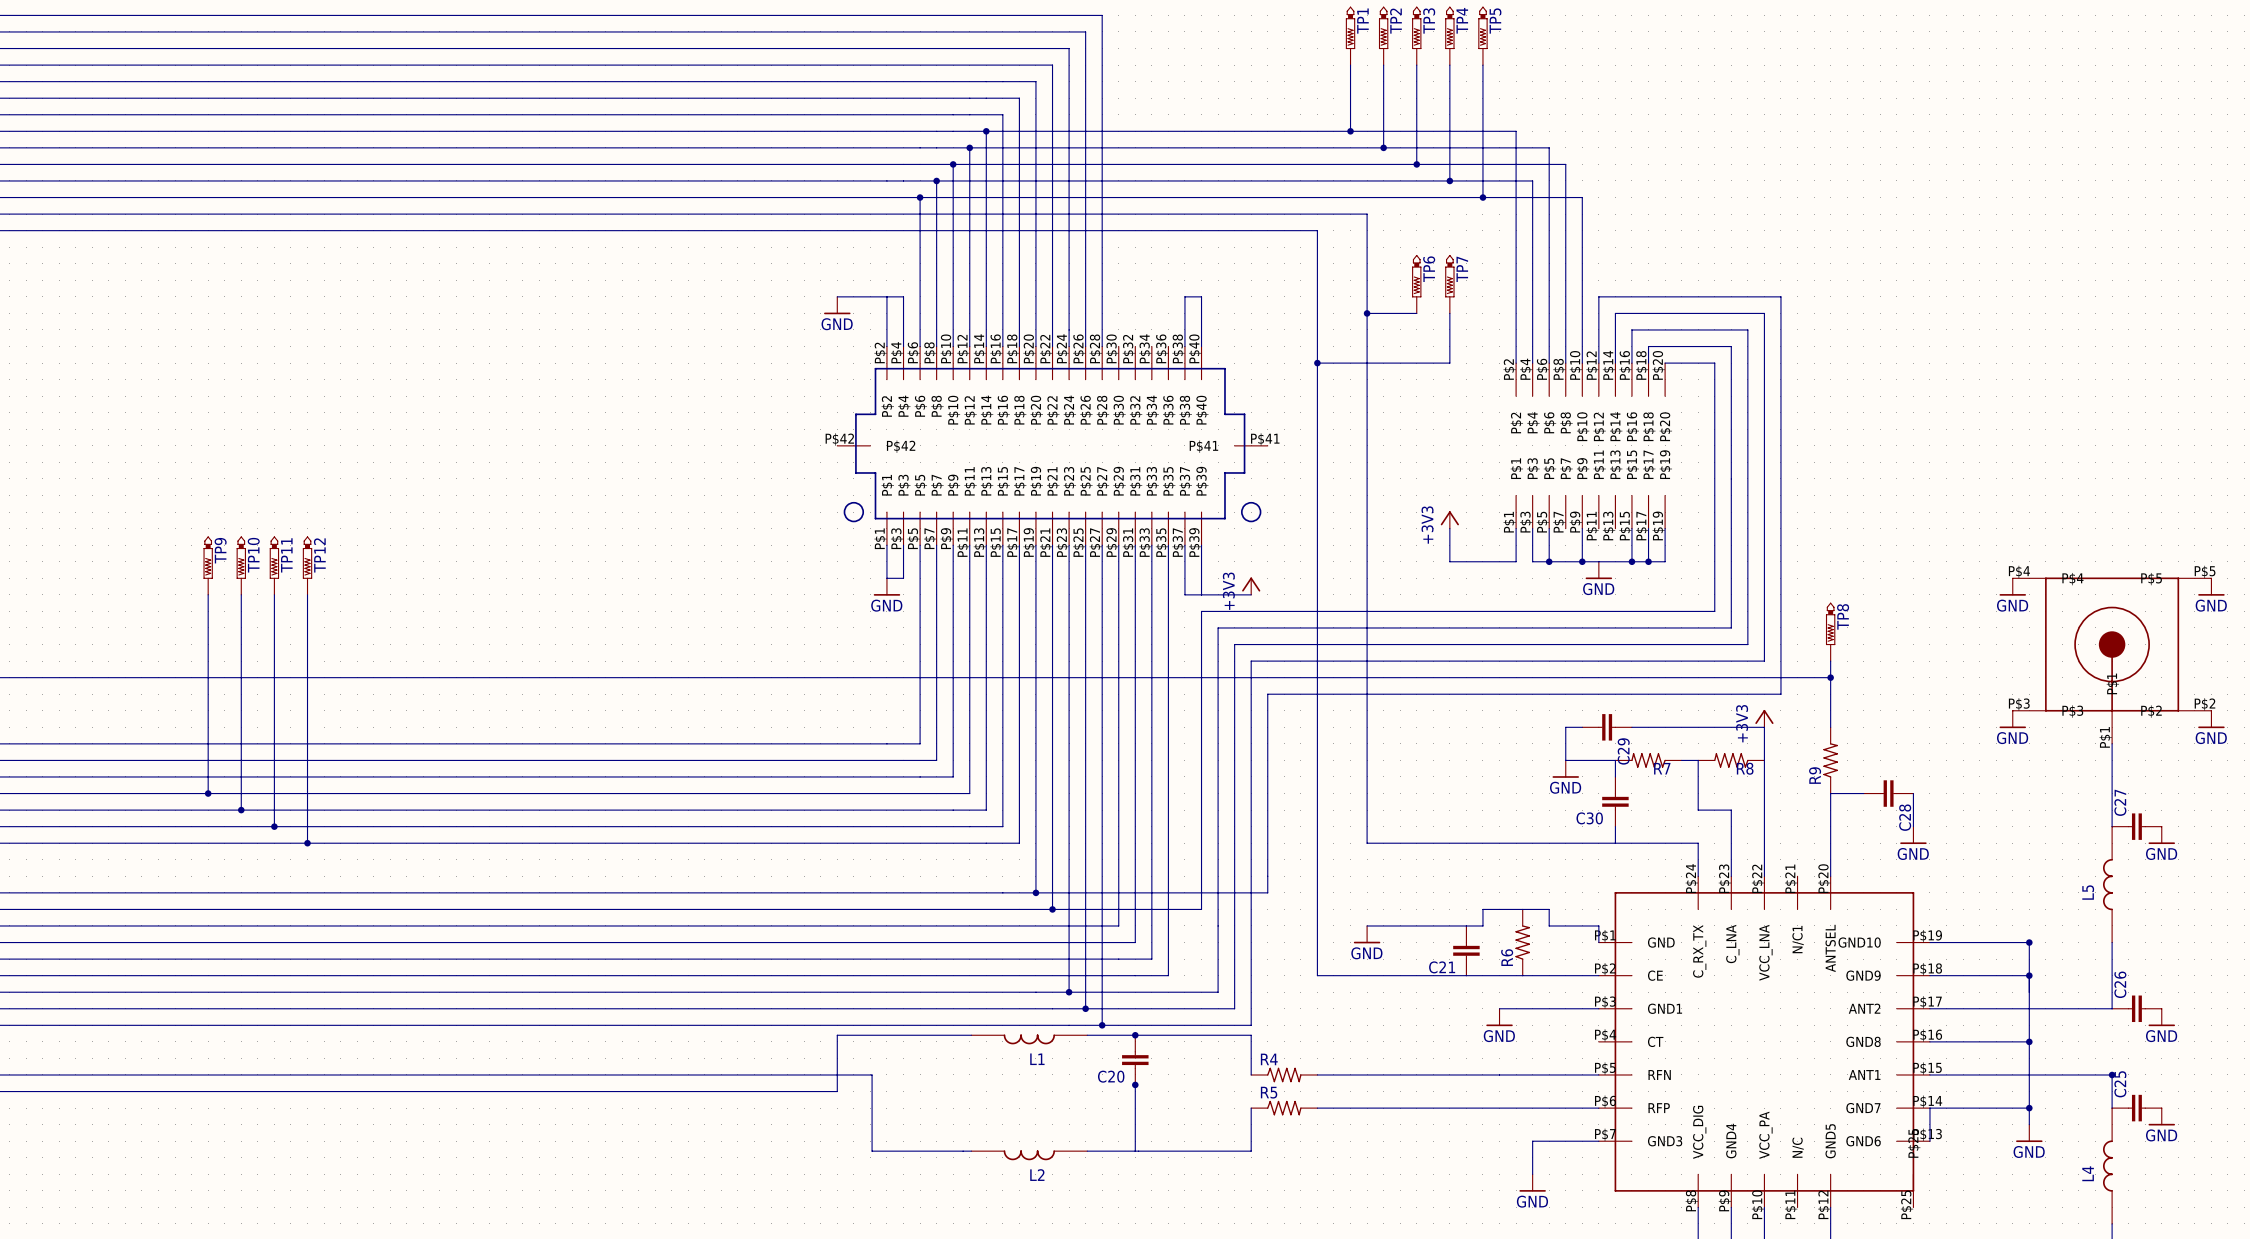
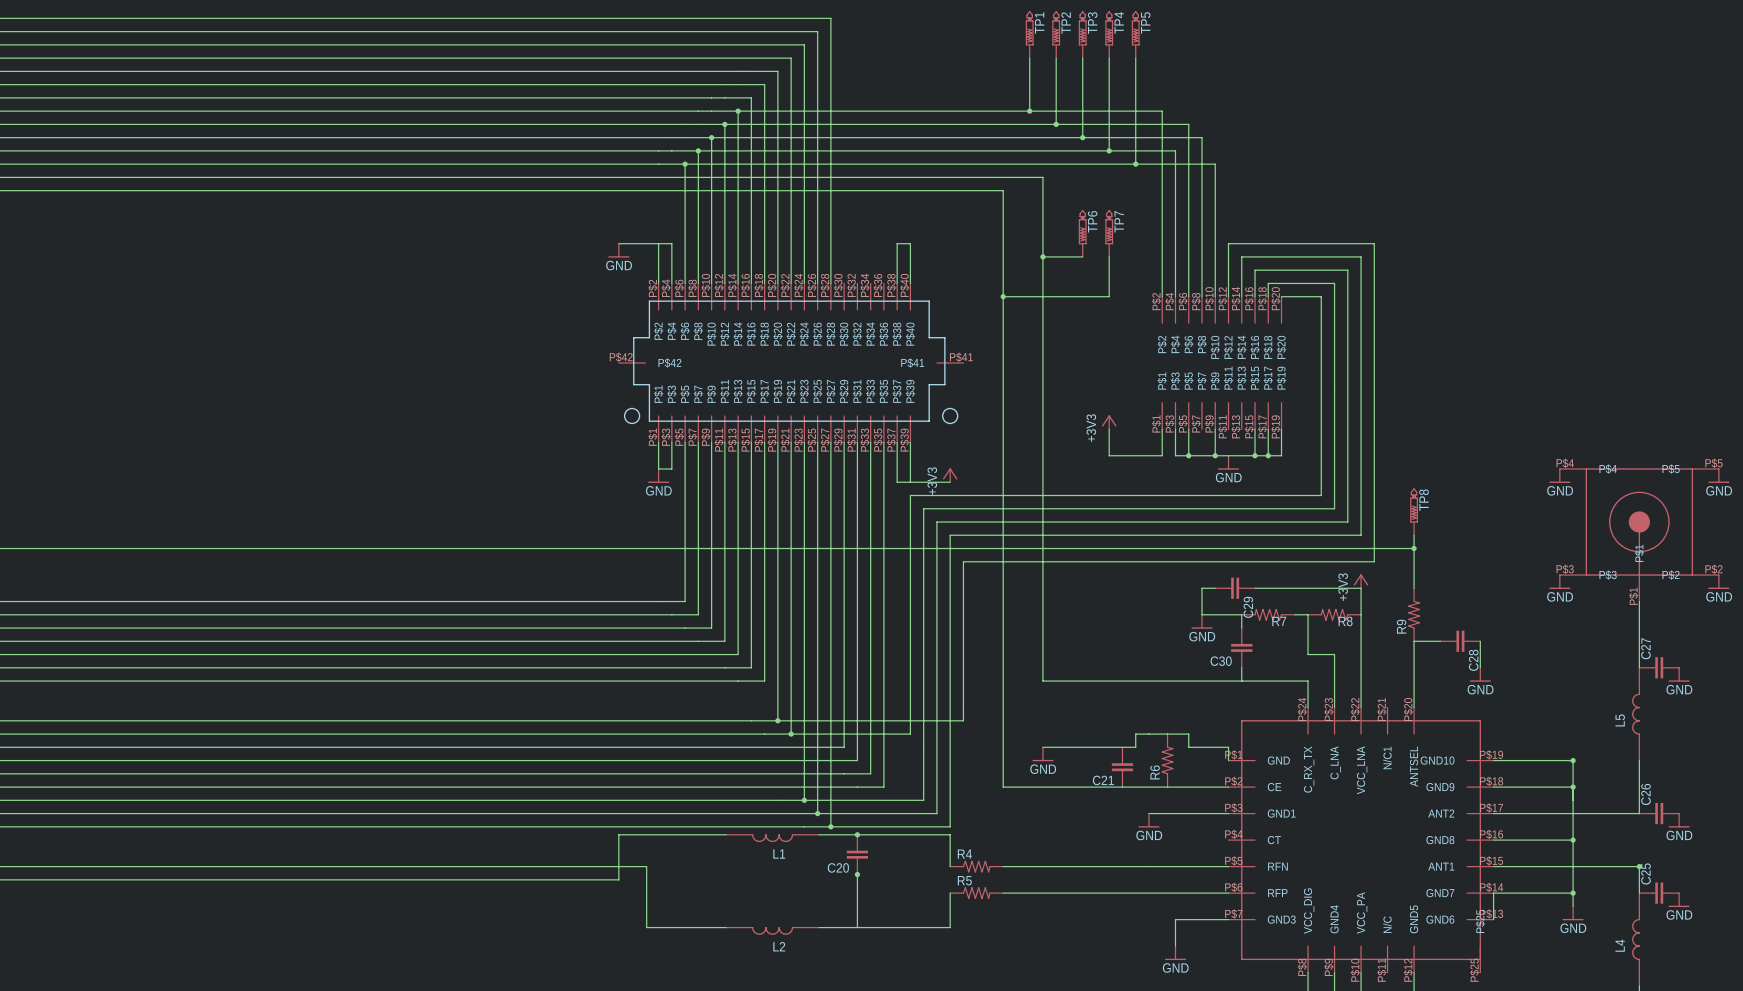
TP9: (208, 565) -> none
TP10: (241, 565) -> none
TP11: (274, 565) -> none
TP12: (307, 565) -> none
wire: (208, 594) (208, 793) -> none
wire: (241, 594) (241, 810) -> none
wire: (274, 594) (274, 826) -> none
wire: (307, 594) (307, 843) -> none
junction: (208, 793) -> none
junction: (241, 810) -> none
junction: (274, 826) -> none
junction: (307, 843) -> none

